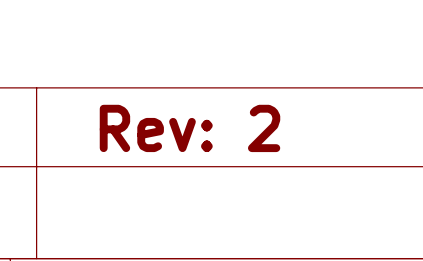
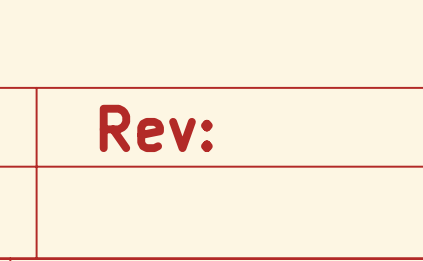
title block: Rev: 2 (190, 128) -> Rev: (156, 128)

